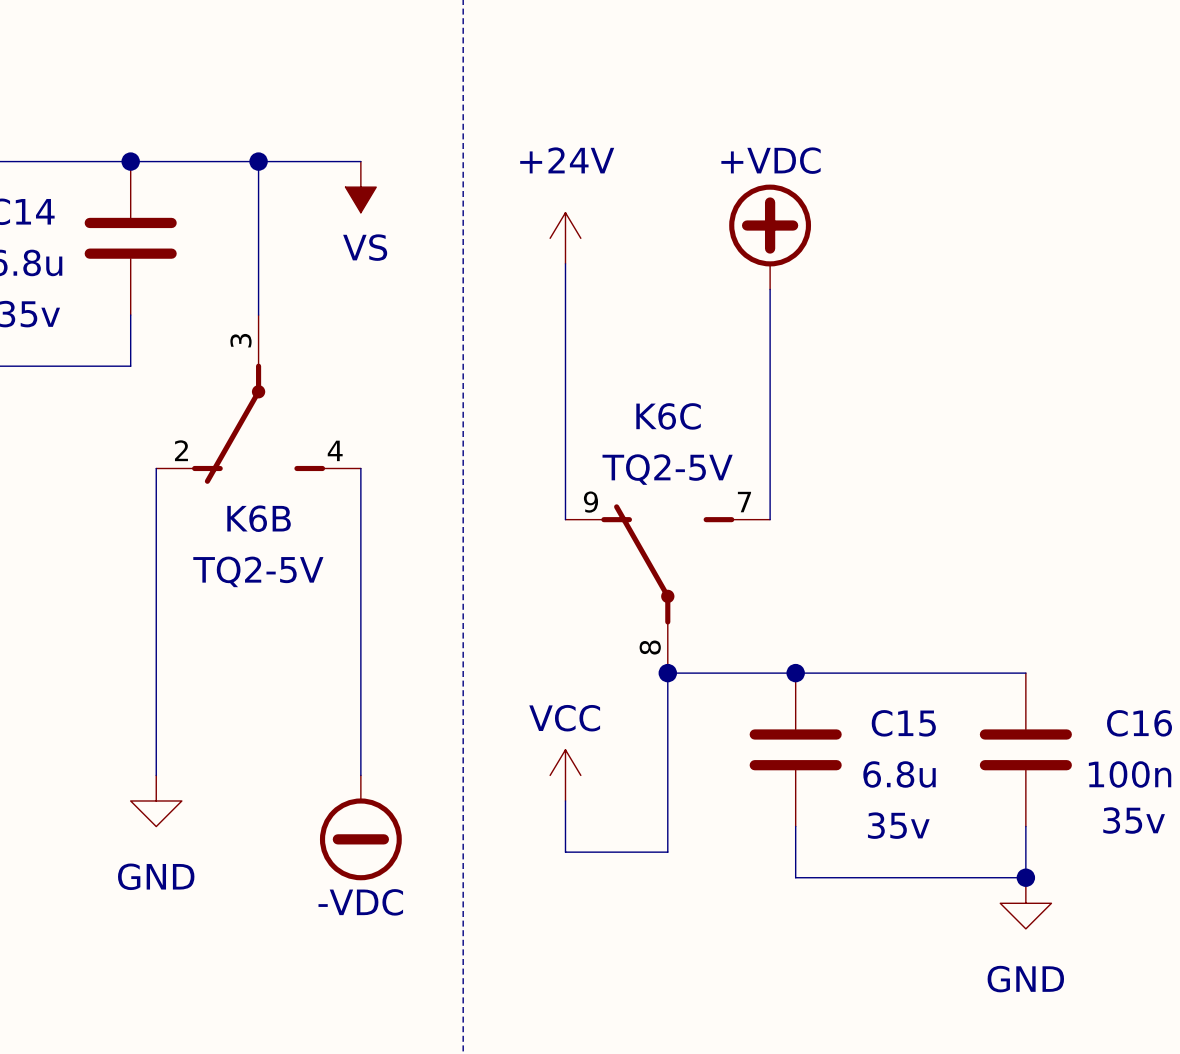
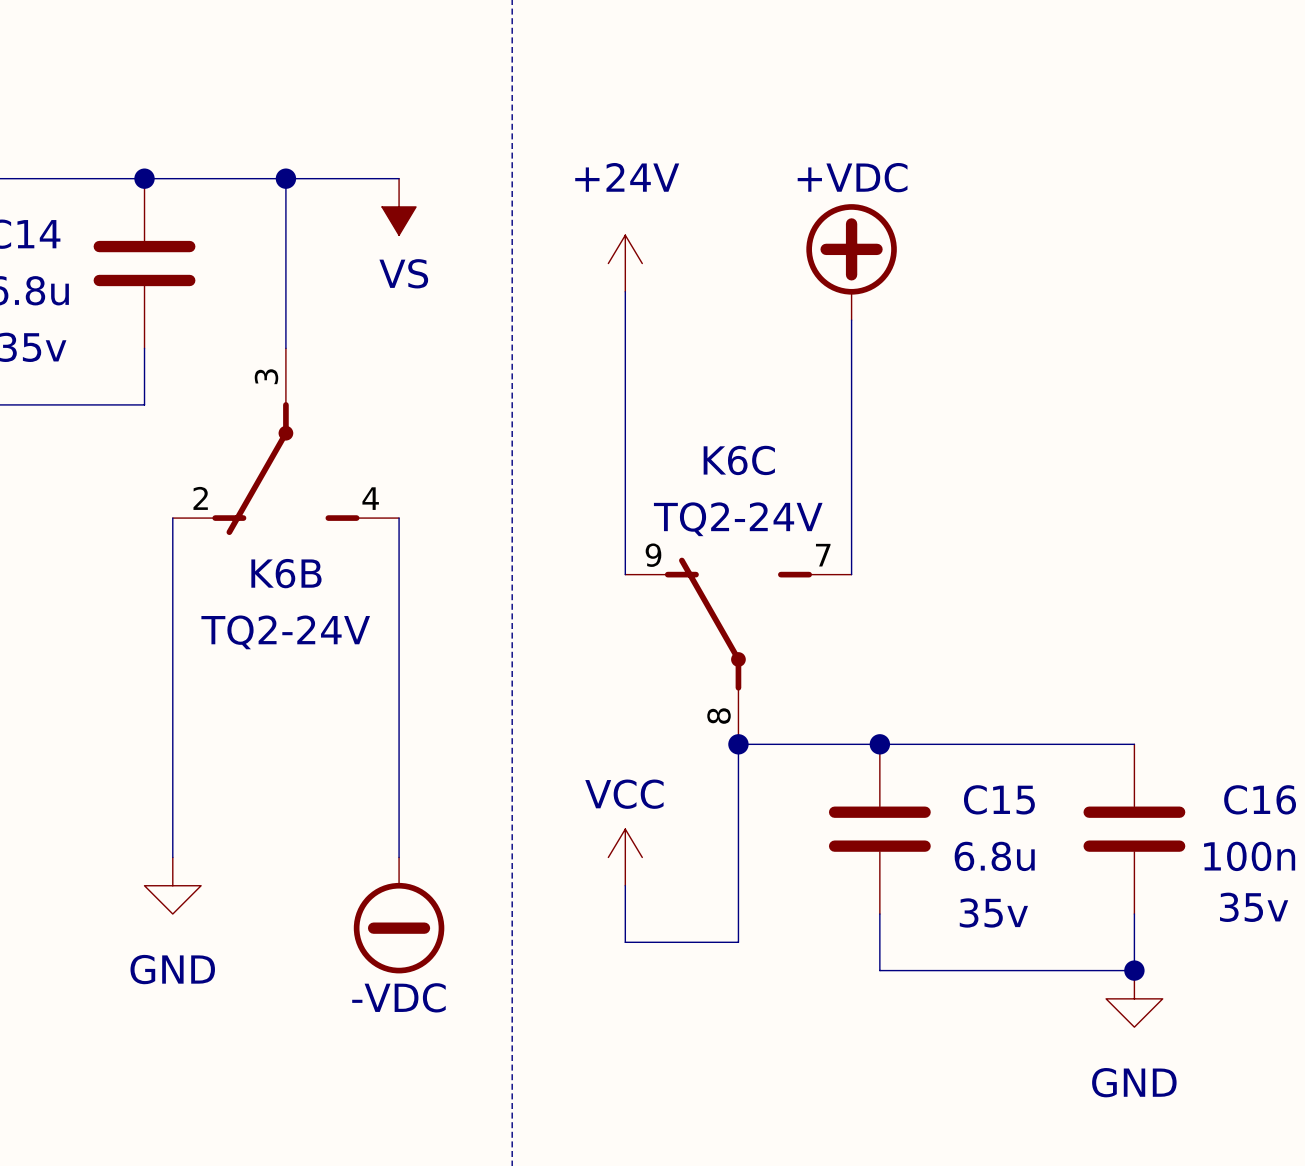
K6C value: TQ2-5V (667, 469) -> TQ2-24V (738, 519)
K6B value: TQ2-5V (258, 571) -> TQ2-24V (285, 632)

